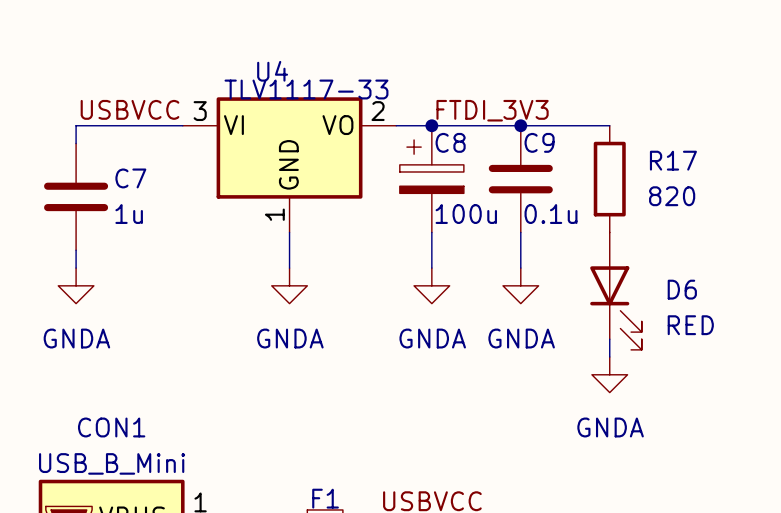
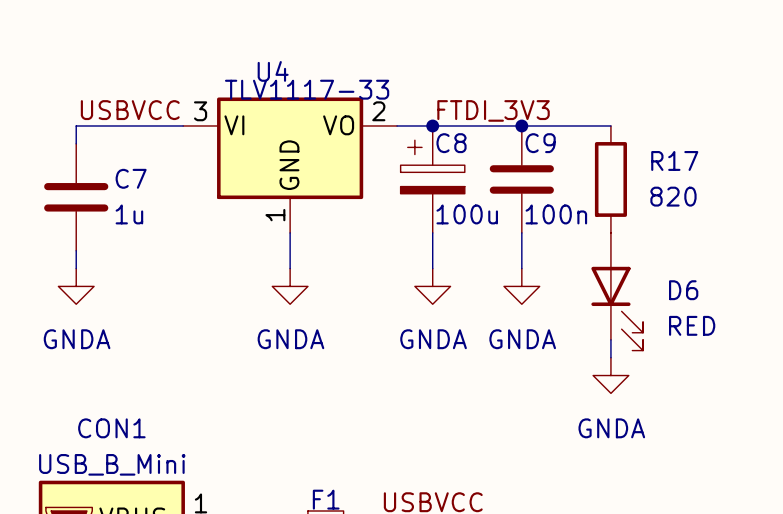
C9 value: 0.1u (551, 214) -> 100n (556, 214)

